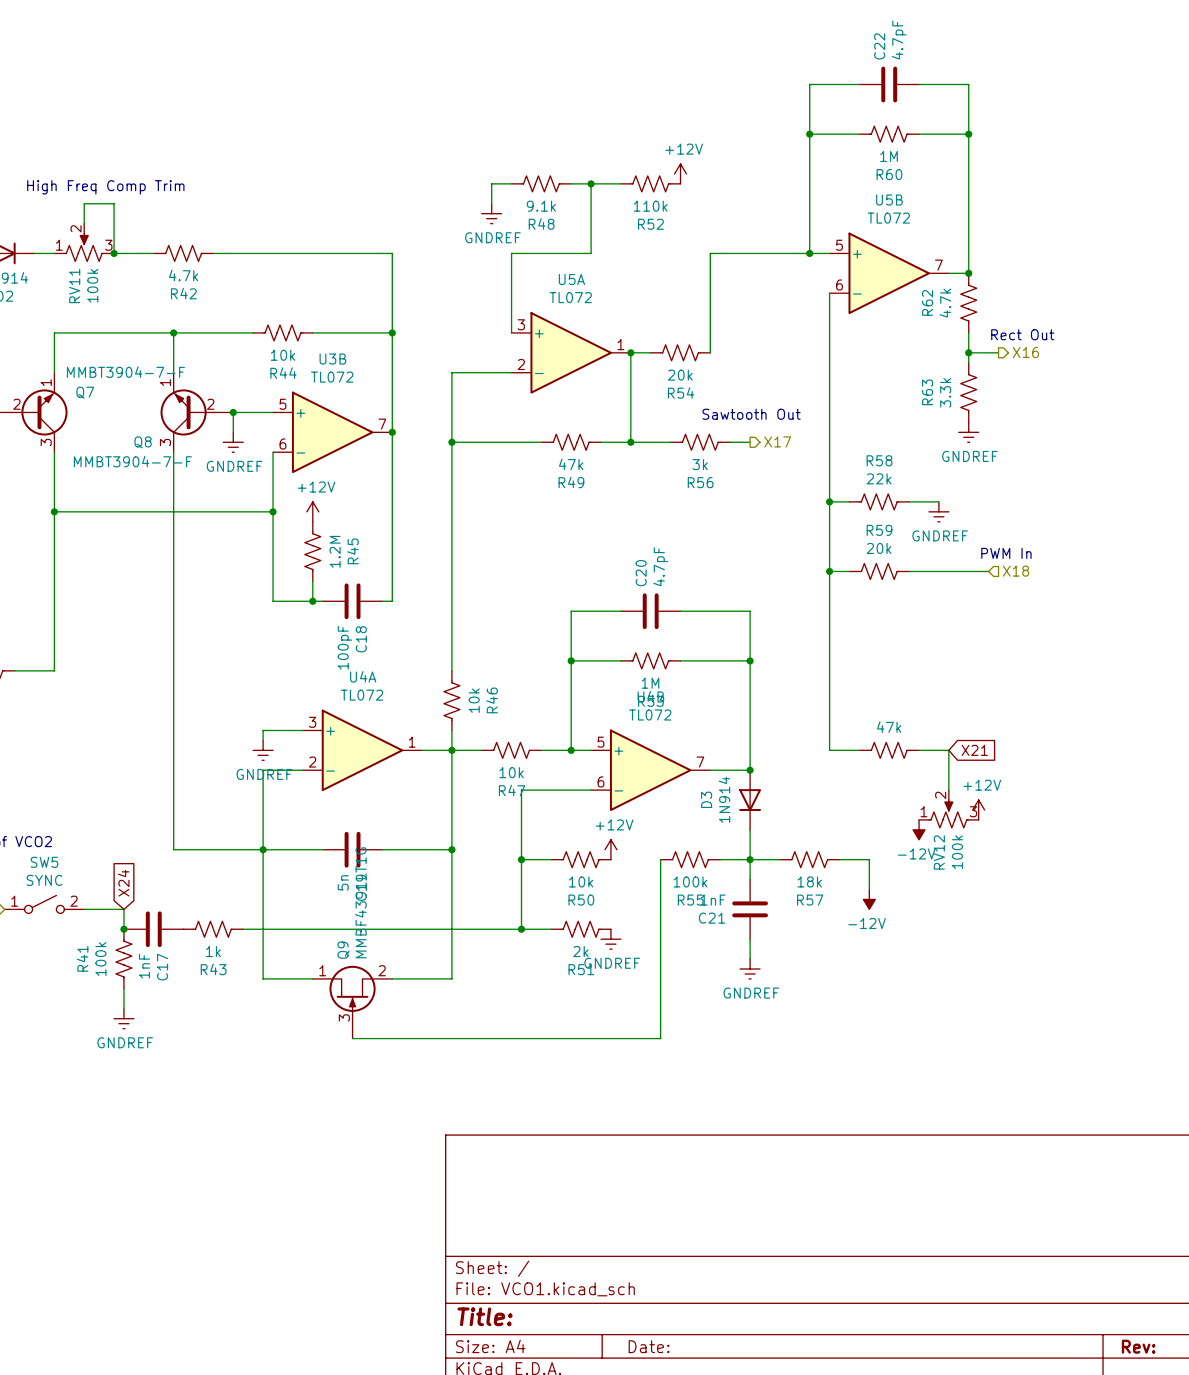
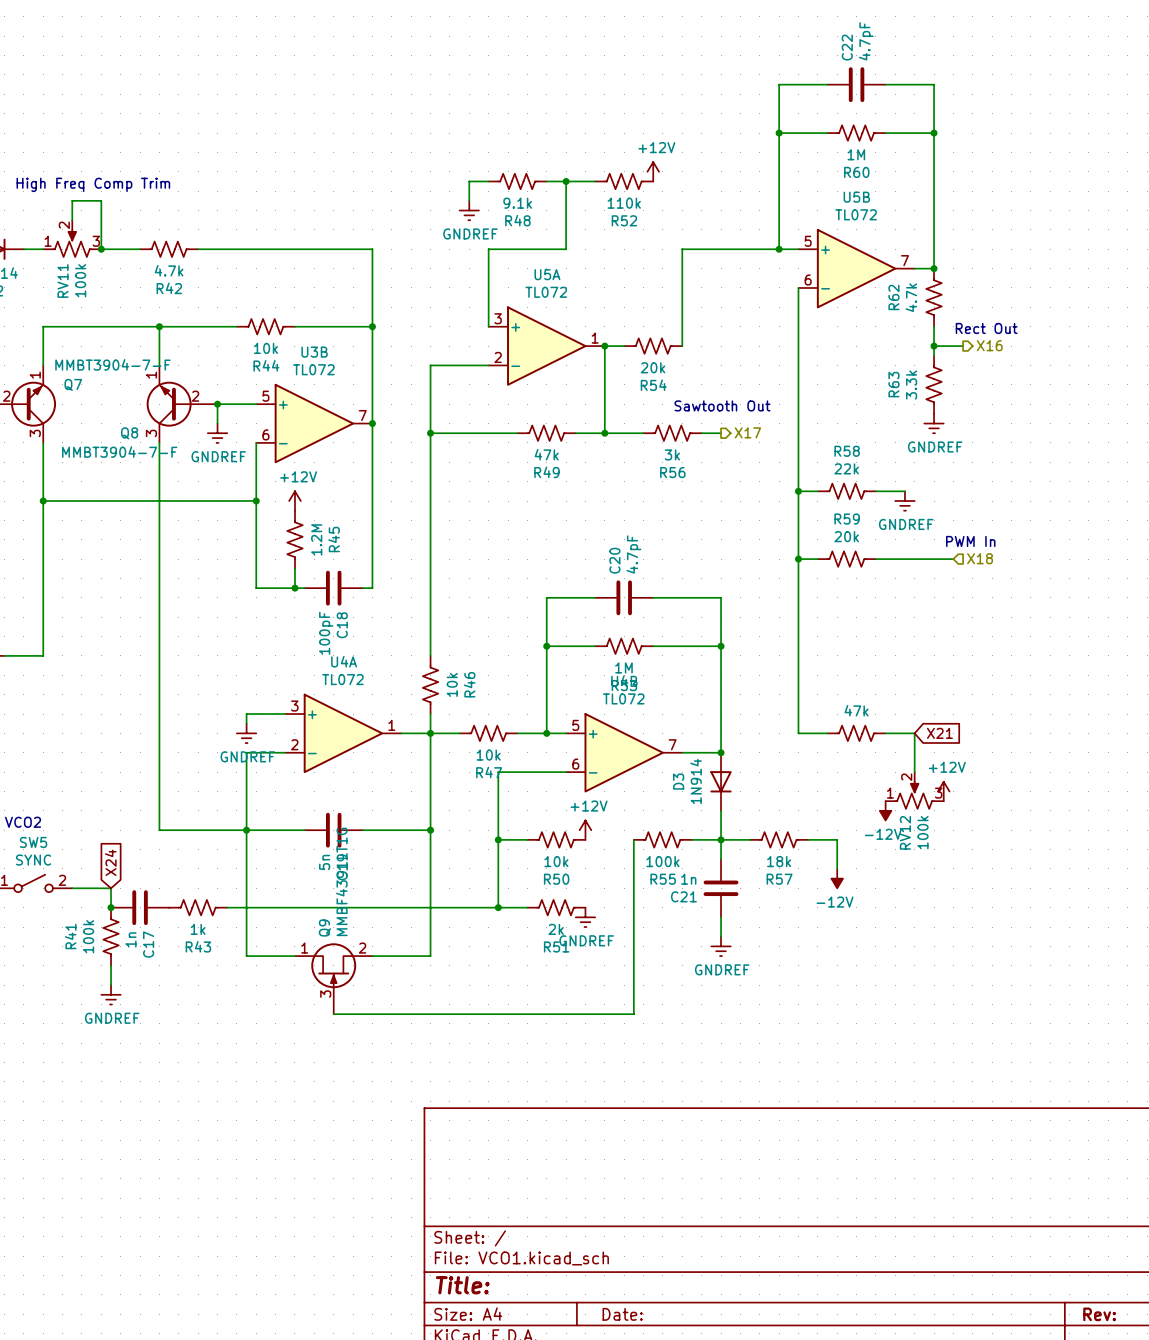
C21 value: 1nF (713, 900) -> 1n (688, 879)
C17 value: 1nF (144, 966) -> 1n (130, 939)

